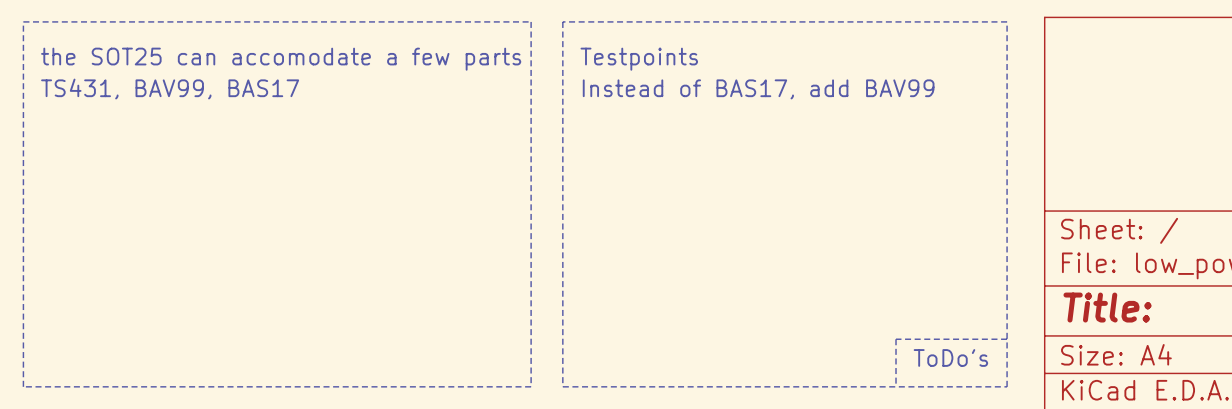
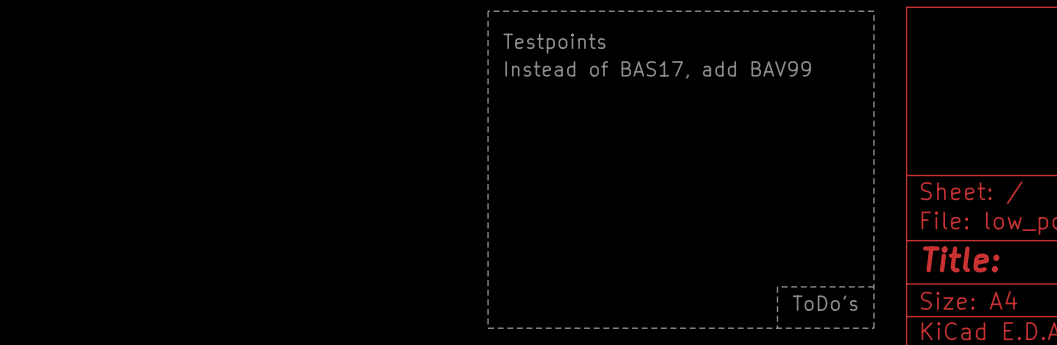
line: (23, 21) (531, 21) (531, 386) (23, 386) (23, 21) -> none
text: the SOT25 can accomodate a few parts (281, 59) -> none
text: TS431, BAV99, BAS17 (170, 89) -> none

